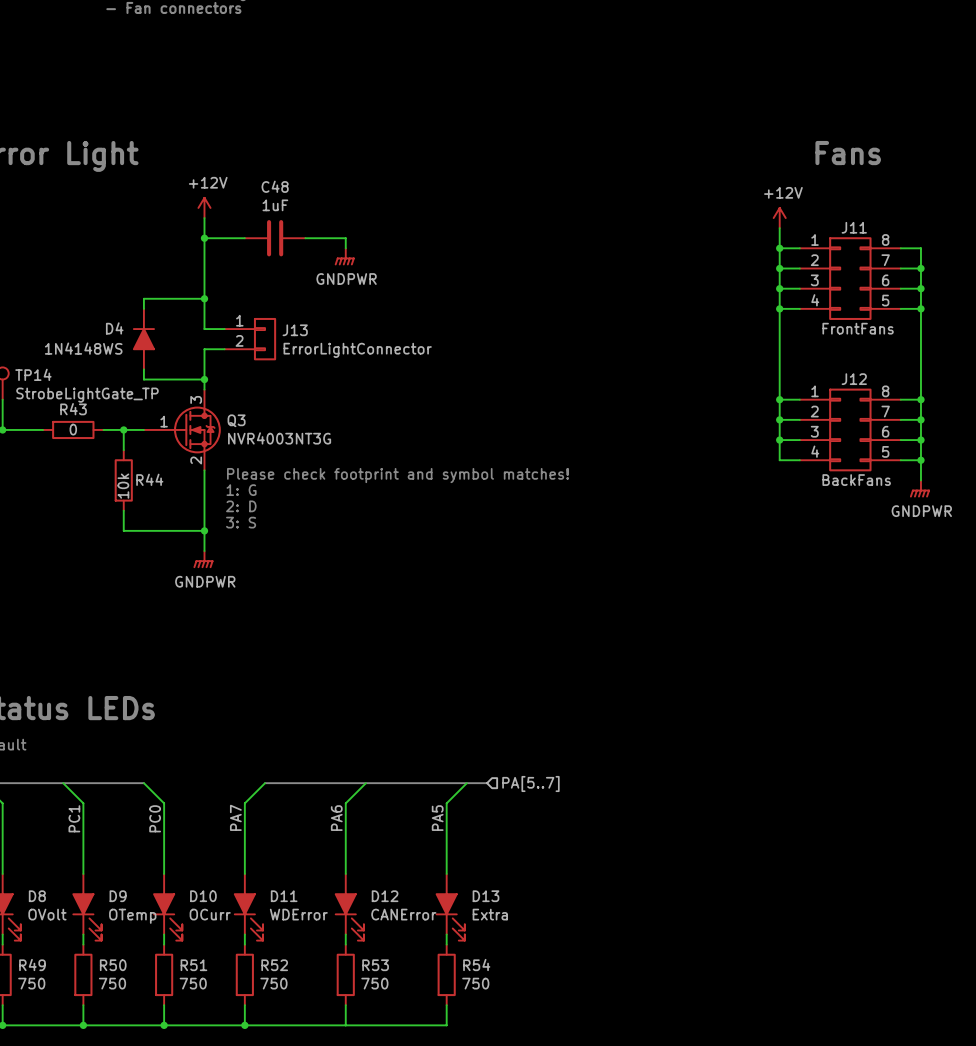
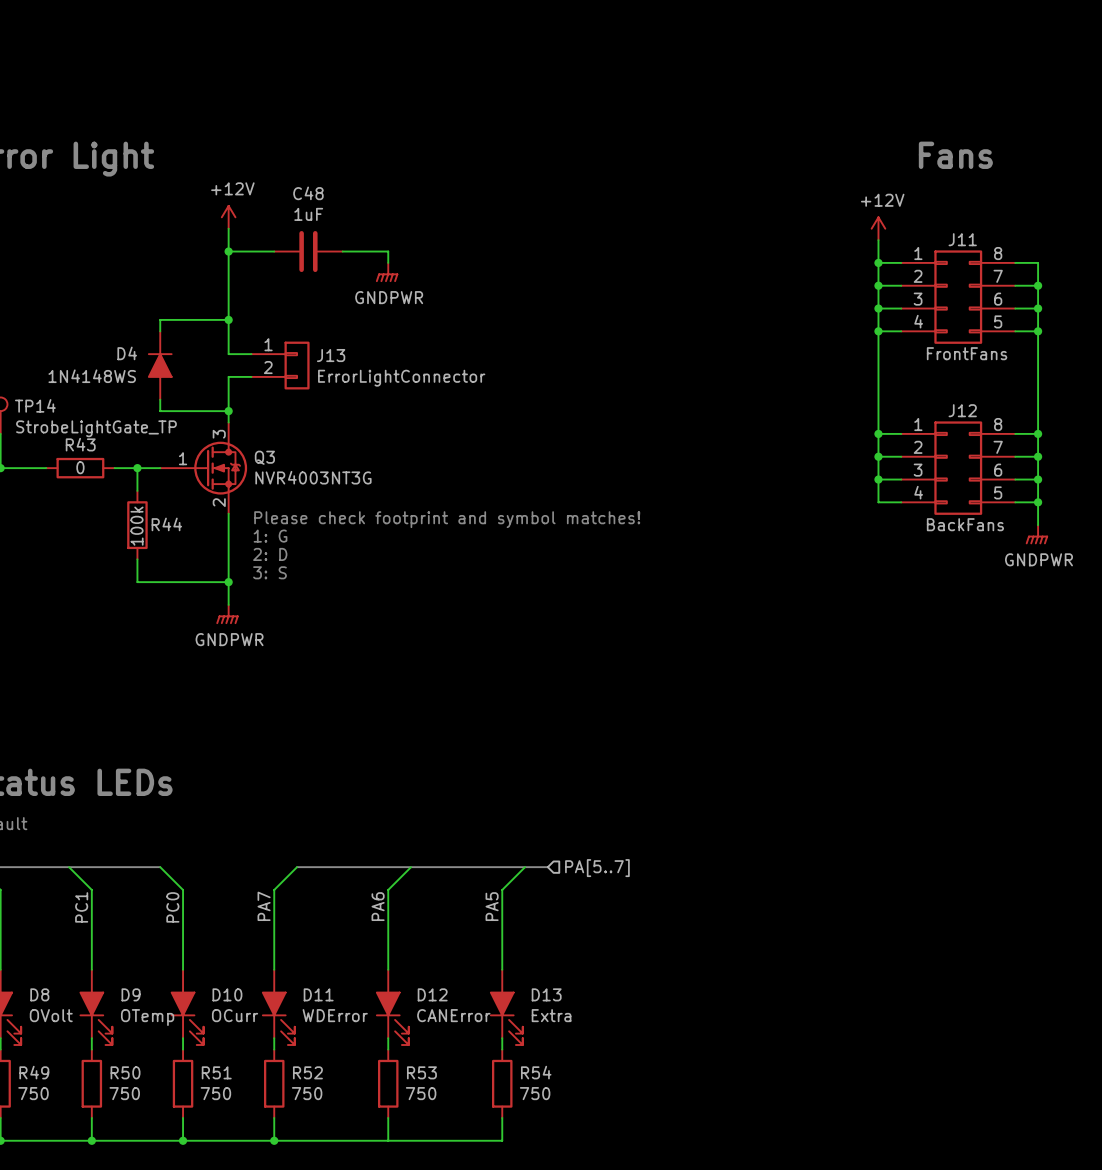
R44 value: 10k (123, 486) -> 100k (137, 526)

